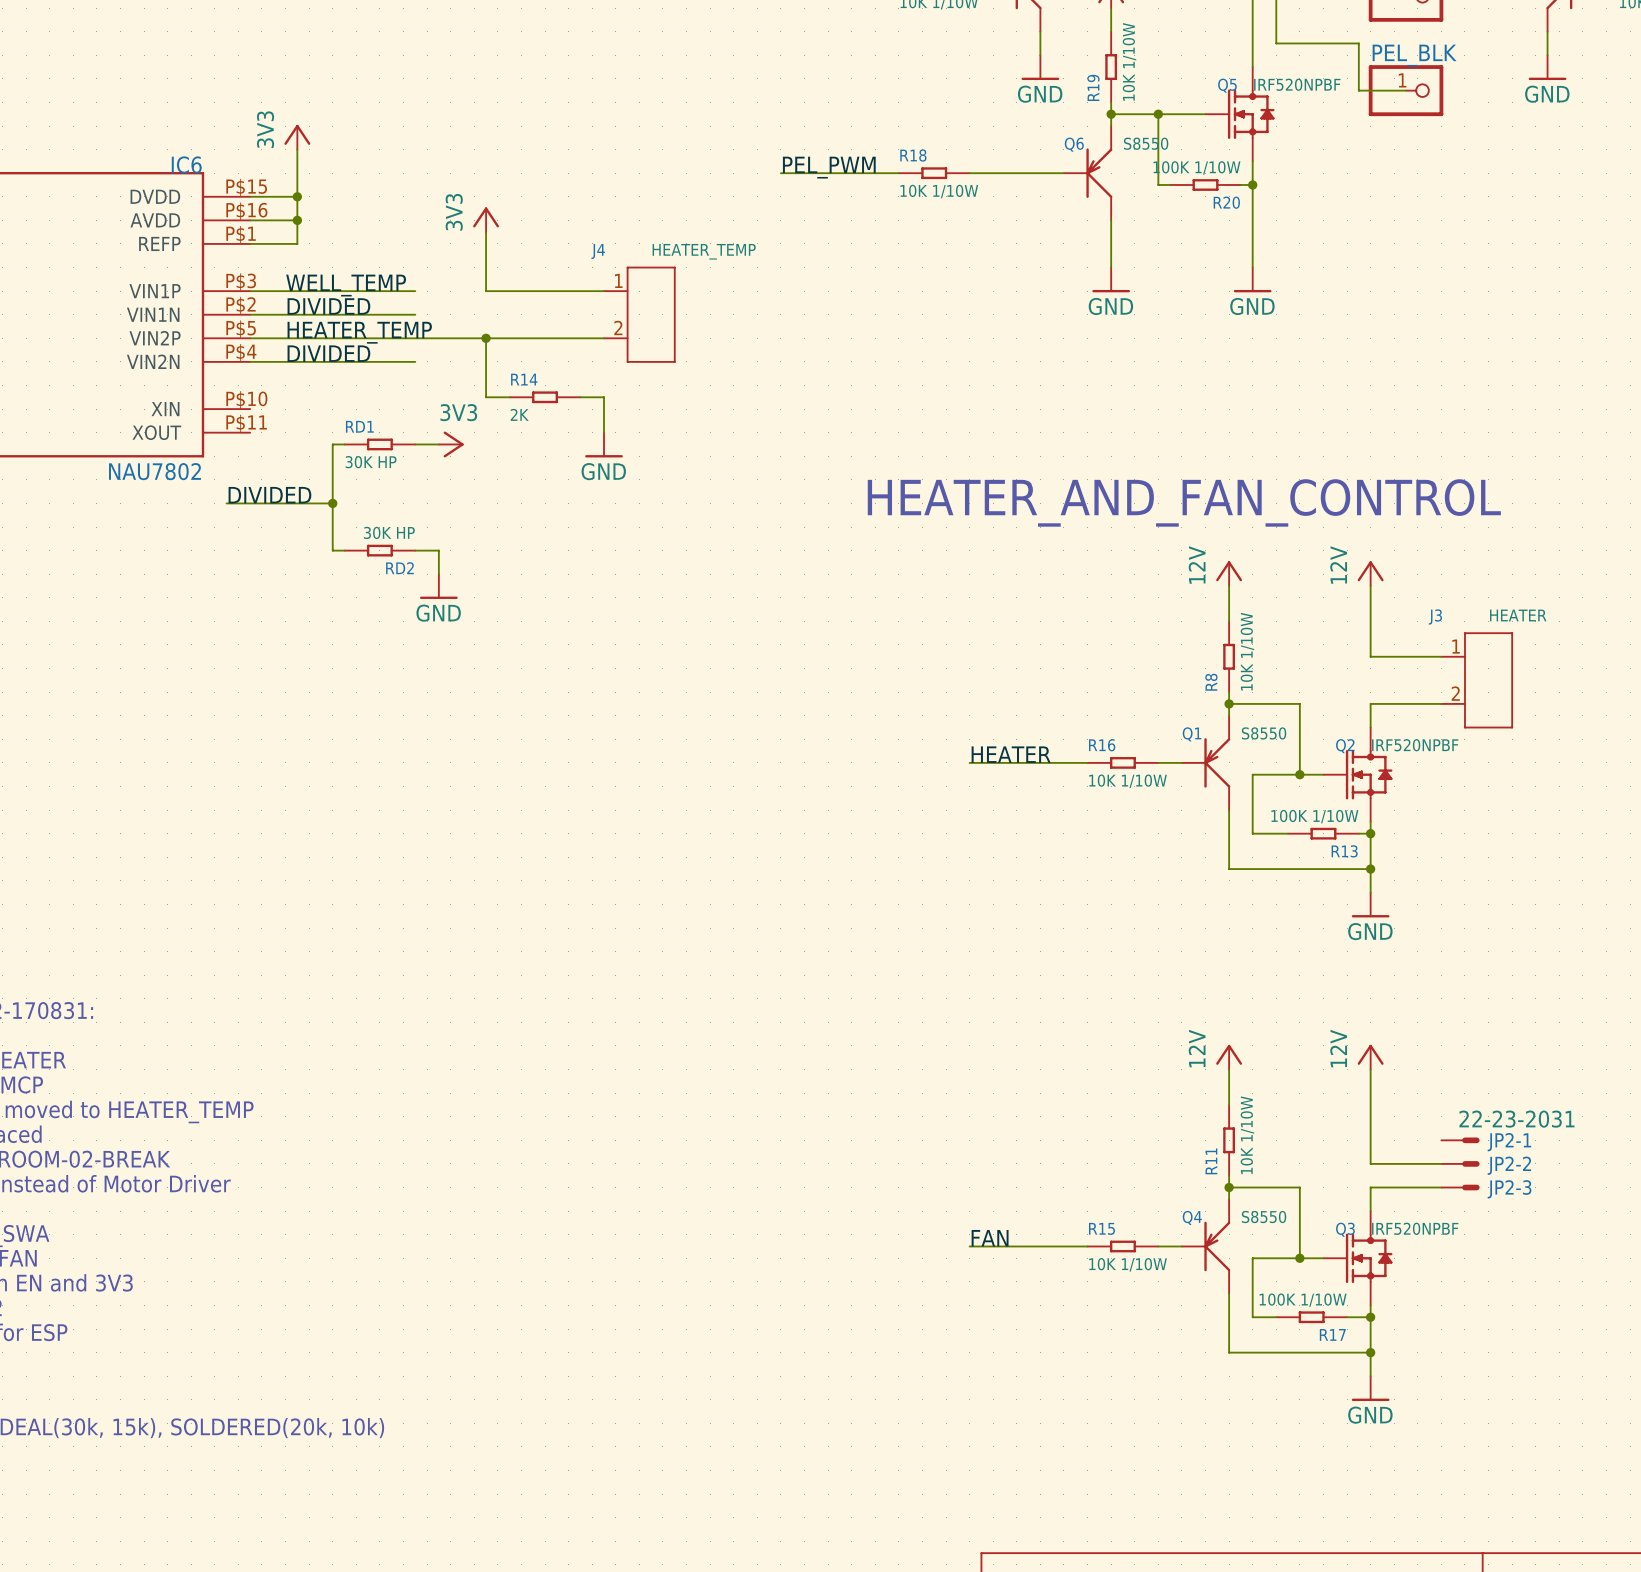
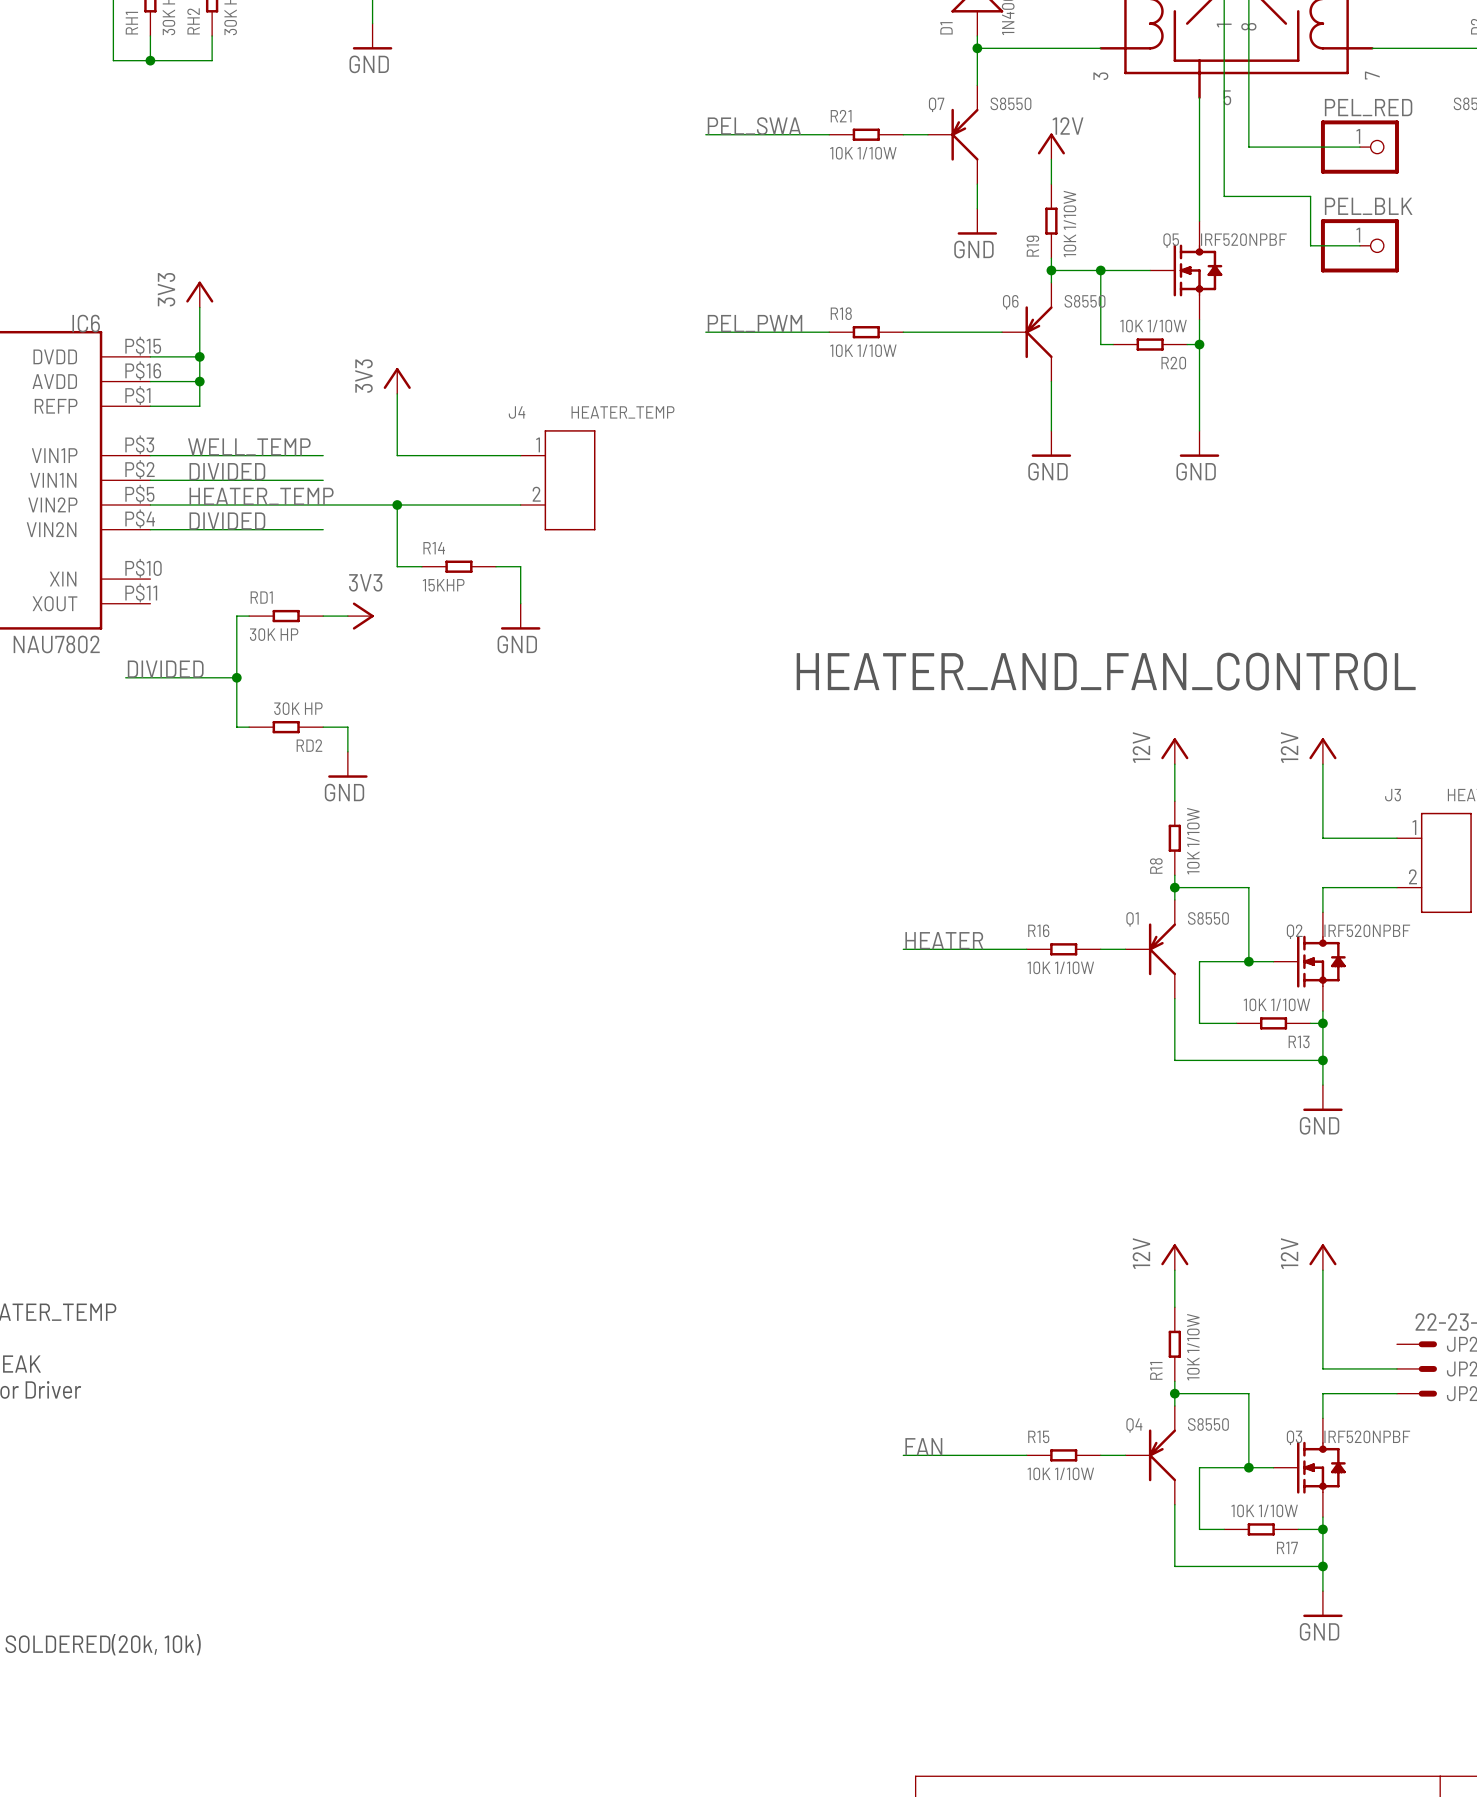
R20 value: 100K 1/10W (1196, 167) -> 10K 1/10W (1153, 326)
R14 value: 2K (519, 414) -> 15KHP (443, 585)
R13 value: 100K 1/10W (1314, 816) -> 10K 1/10W (1276, 1004)
R17 value: 100K 1/10W (1303, 1300) -> 10K 1/10W (1264, 1510)

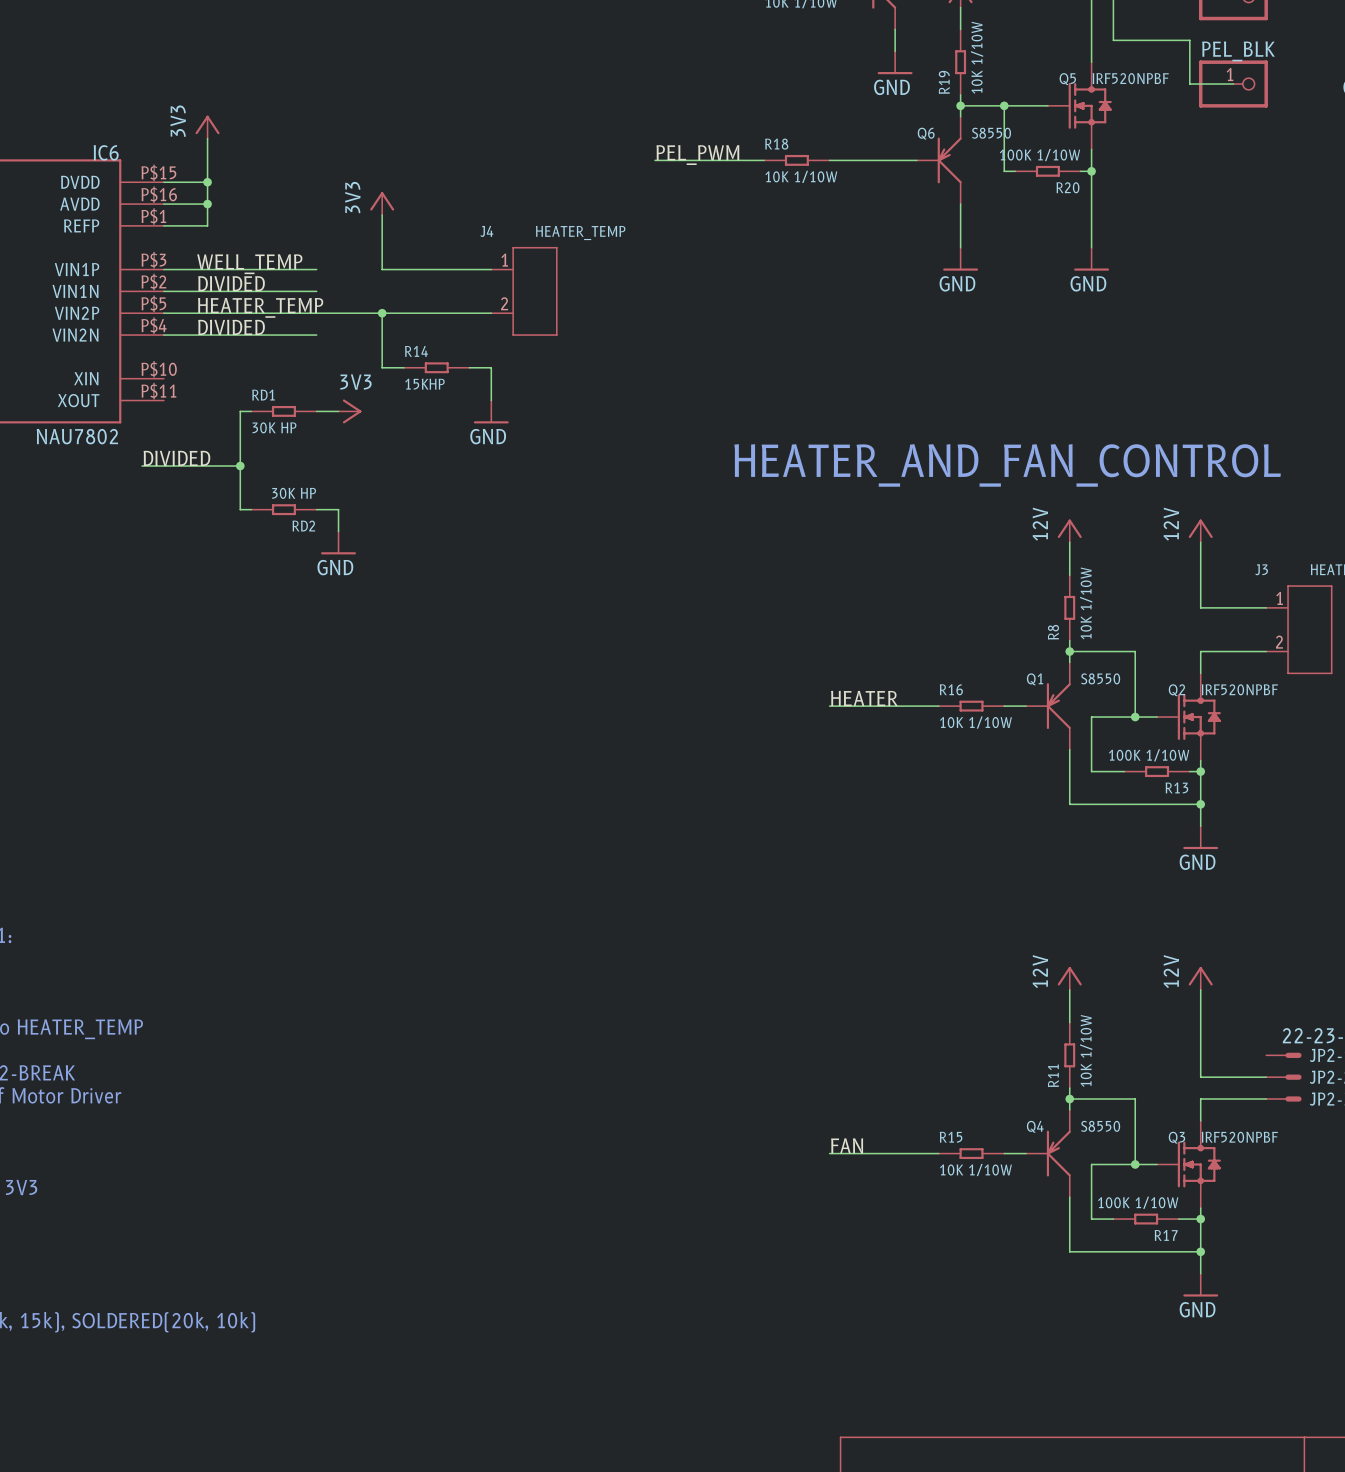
R20 value: 10K 1/10W (1153, 326) -> 100K 1/10W (1039, 155)
R13 value: 10K 1/10W (1276, 1004) -> 100K 1/10W (1149, 755)
R17 value: 10K 1/10W (1264, 1510) -> 100K 1/10W (1138, 1202)

